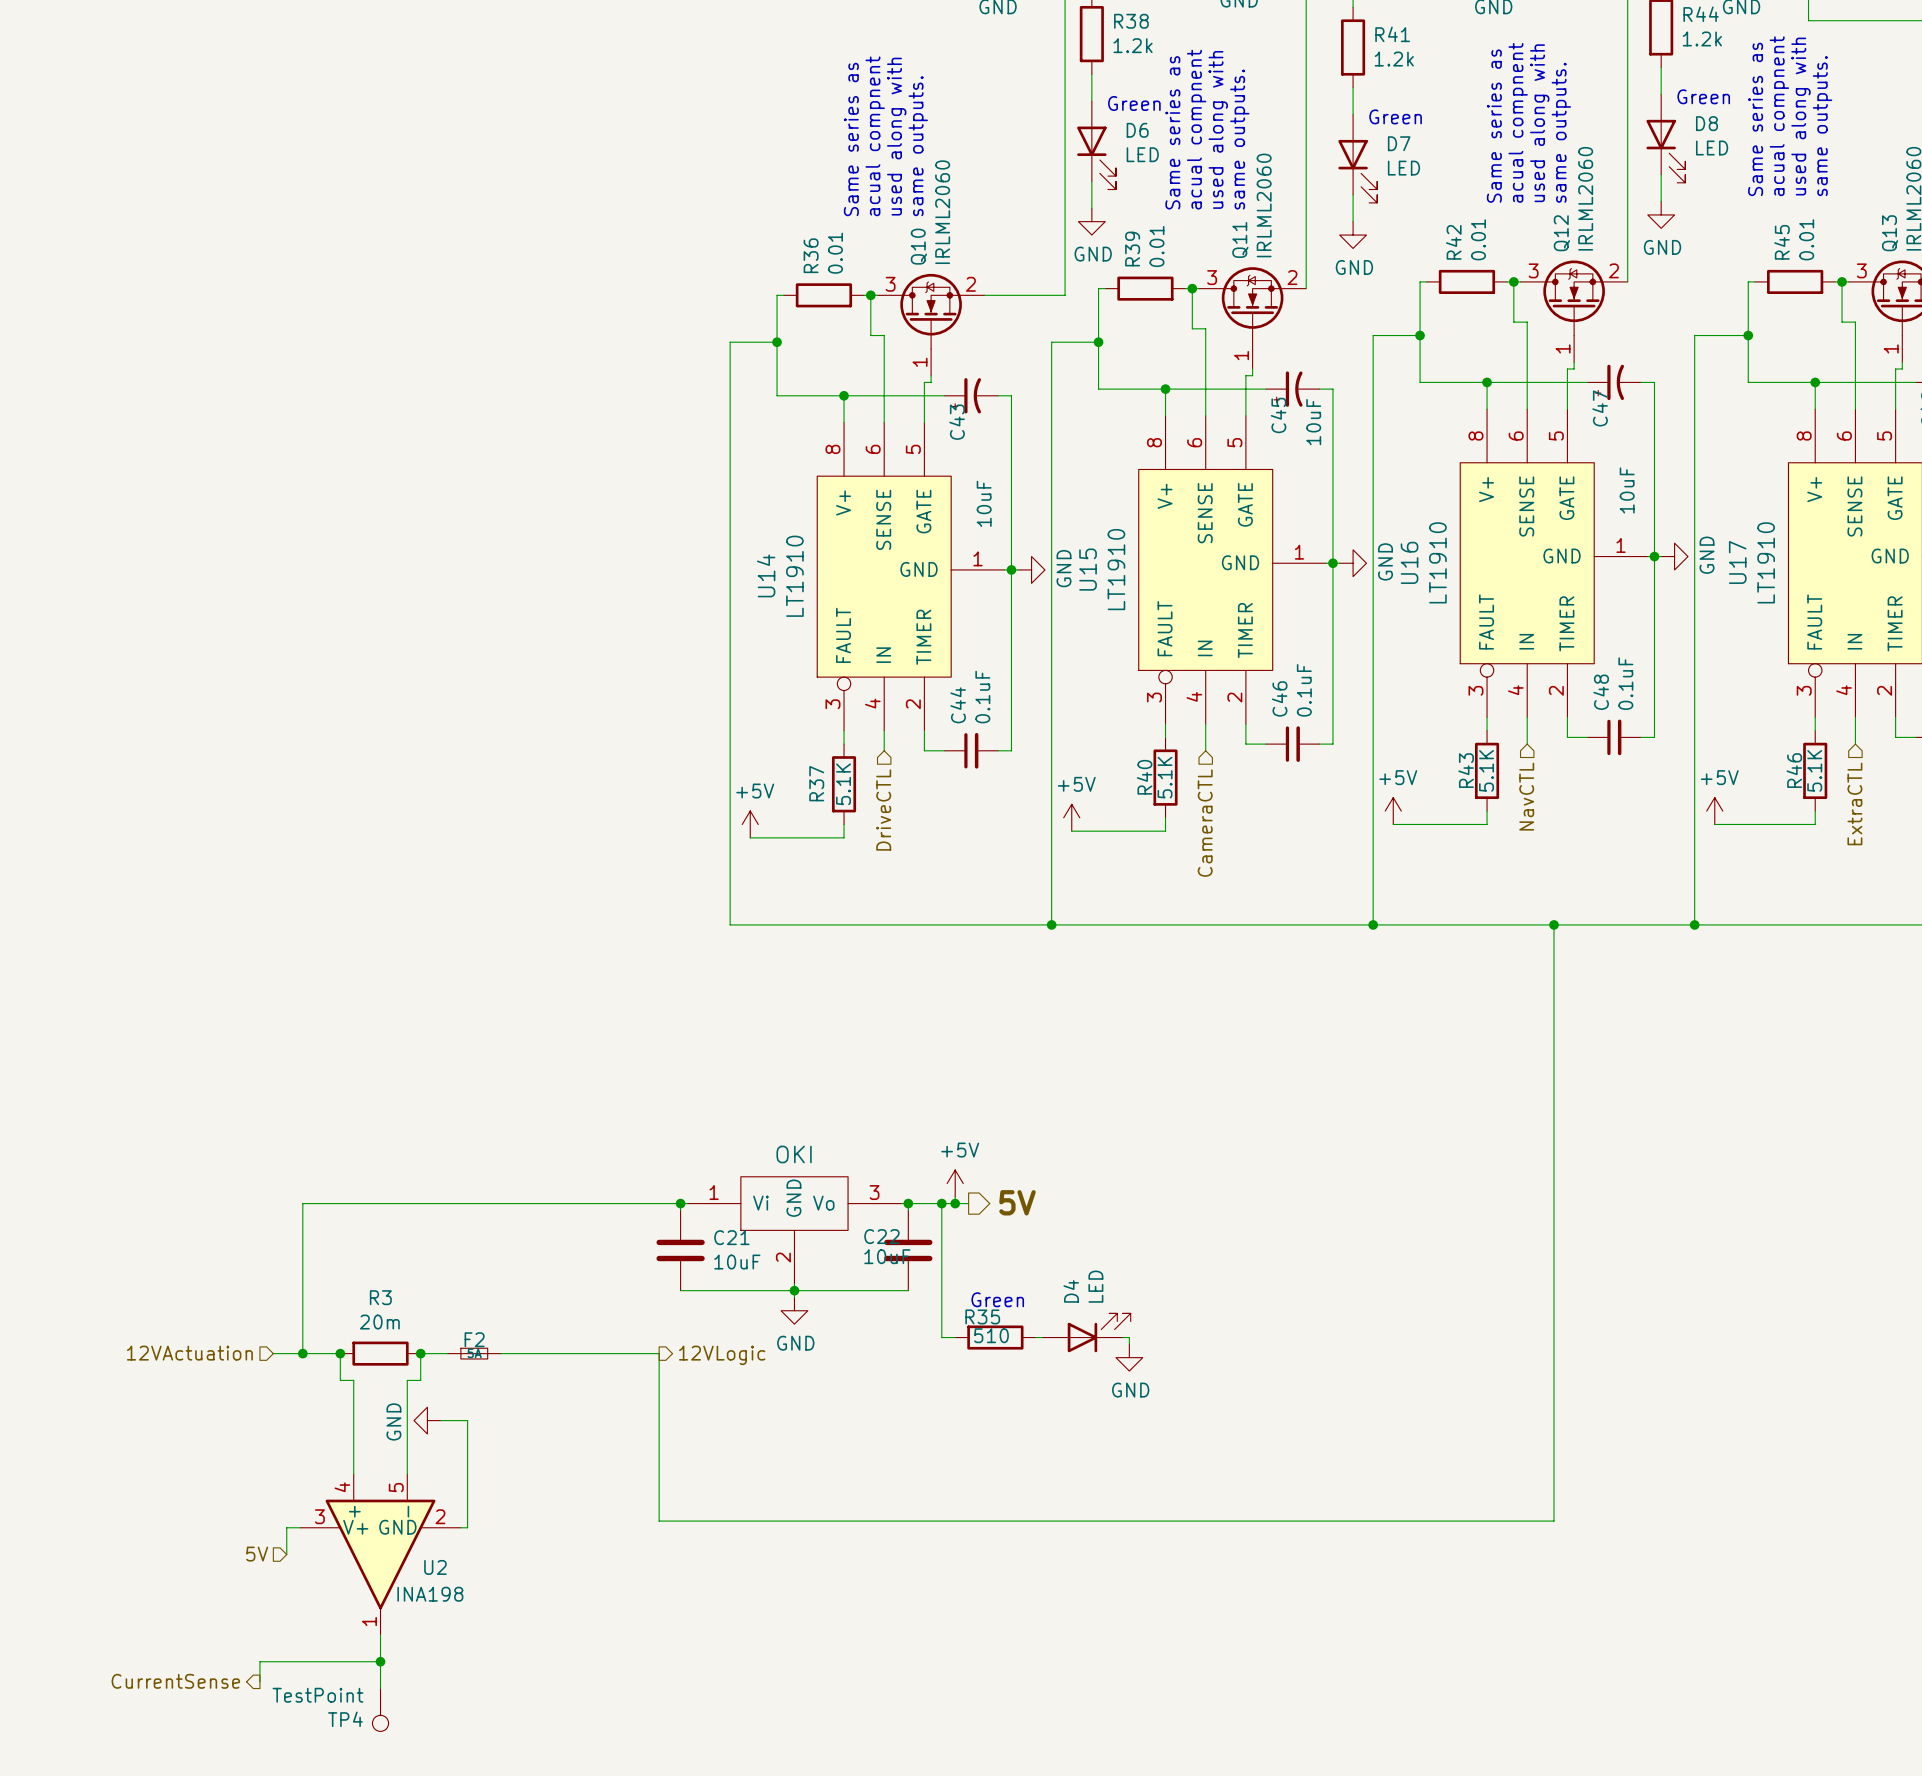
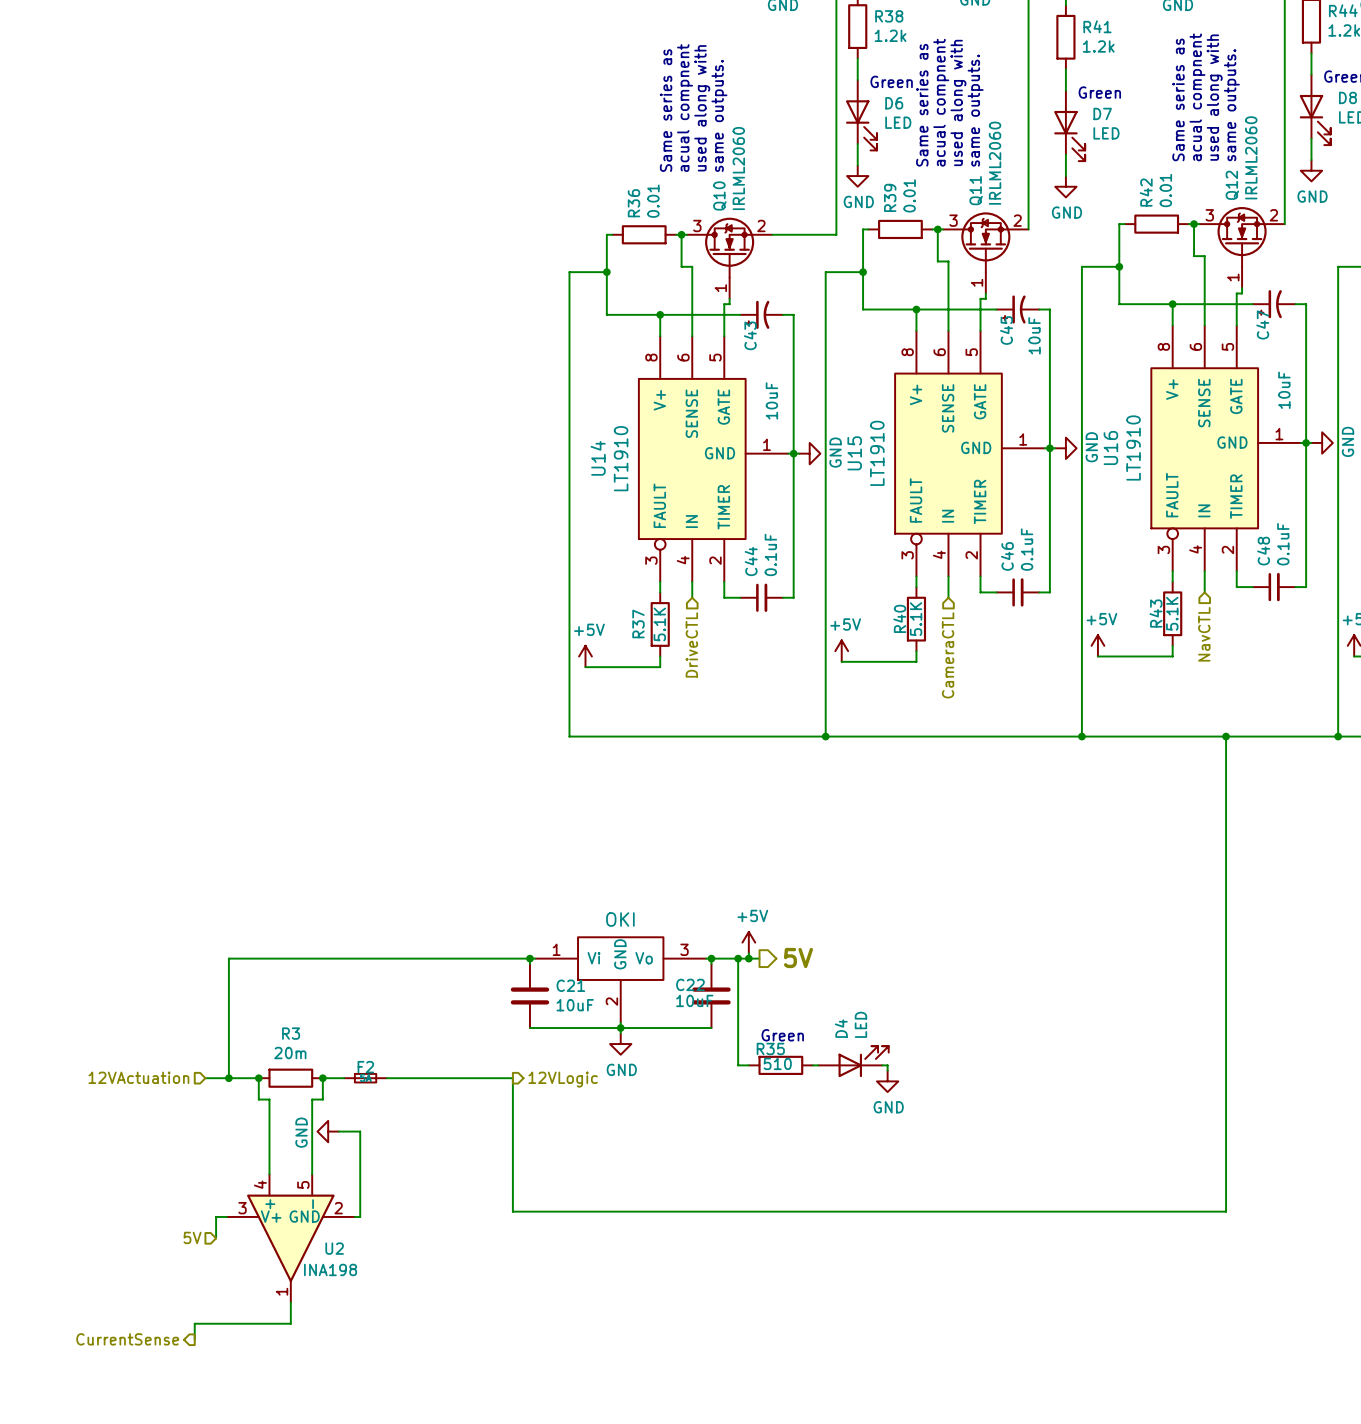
wire: (380, 1661) (380, 1688) -> none
junction: (380, 1661) -> none
TP4: TestPoint (380, 1709) -> none

